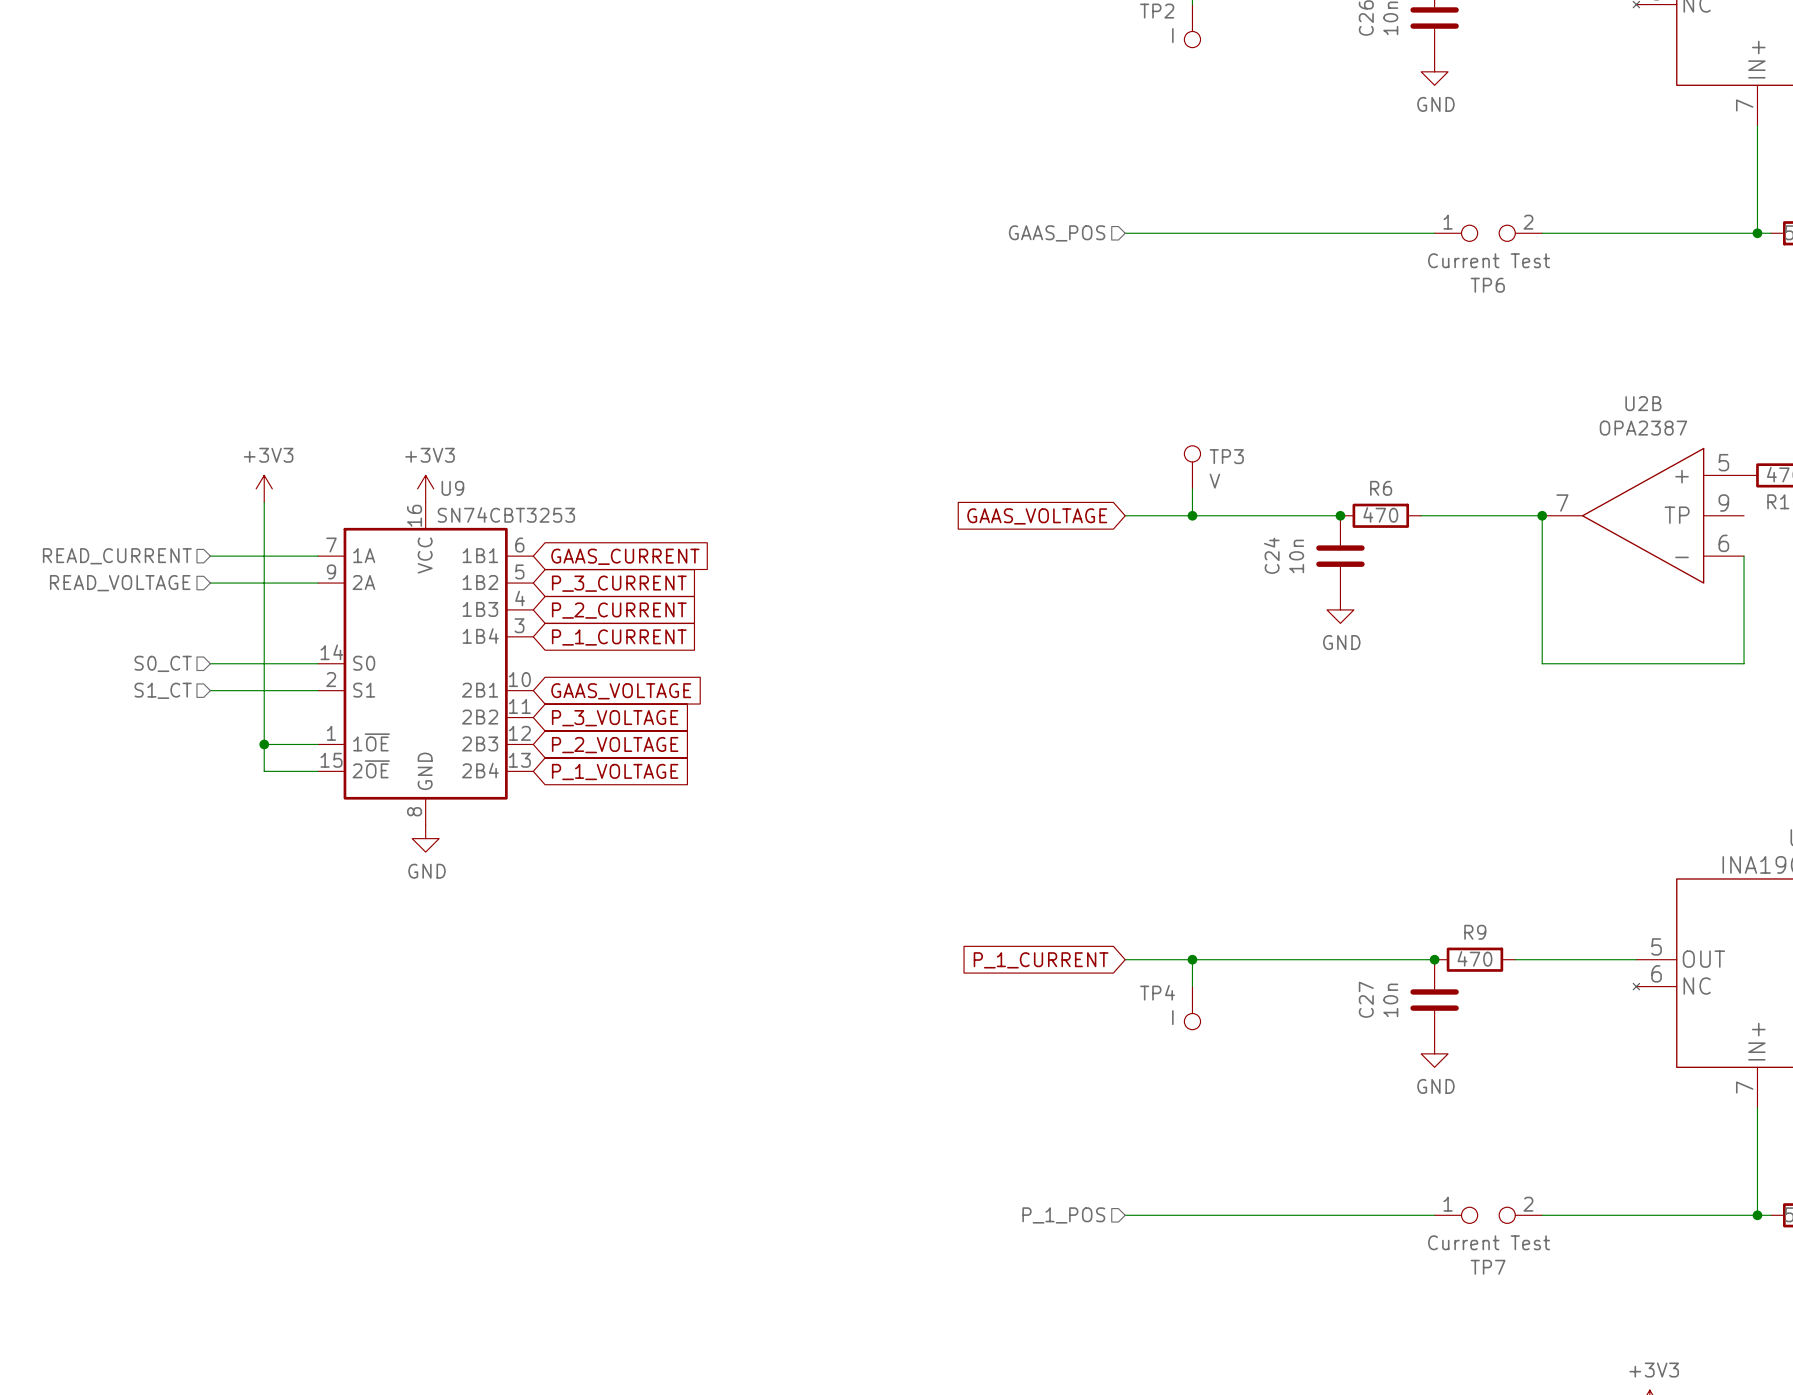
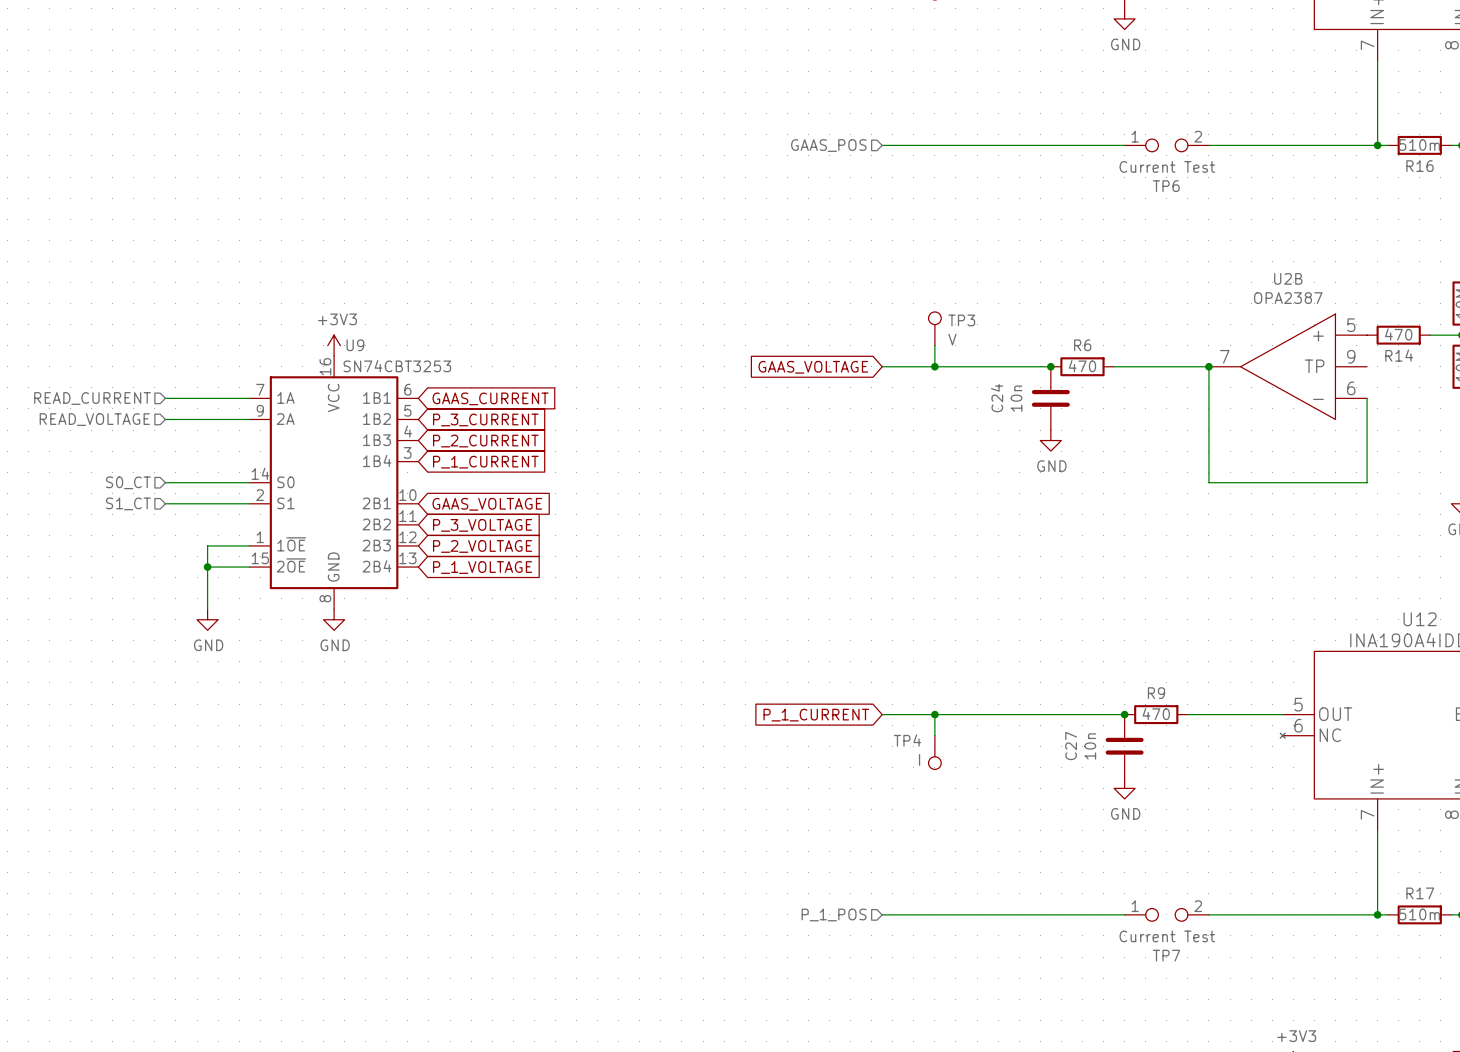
power symbol: +3V3 (264, 488) -> none
wire: (264, 502) (264, 744) -> none
junction position: (264, 744) -> (207, 567)
wire: none -> (207, 567) (207, 609)
power symbol: none -> GND (207, 619)

